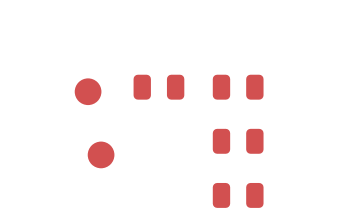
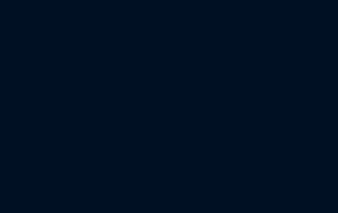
part: (158, 87) -> none
part: (238, 87) -> none
part: (88, 91) -> none
part: (238, 141) -> none
part: (101, 154) -> none
part: (238, 195) -> none

